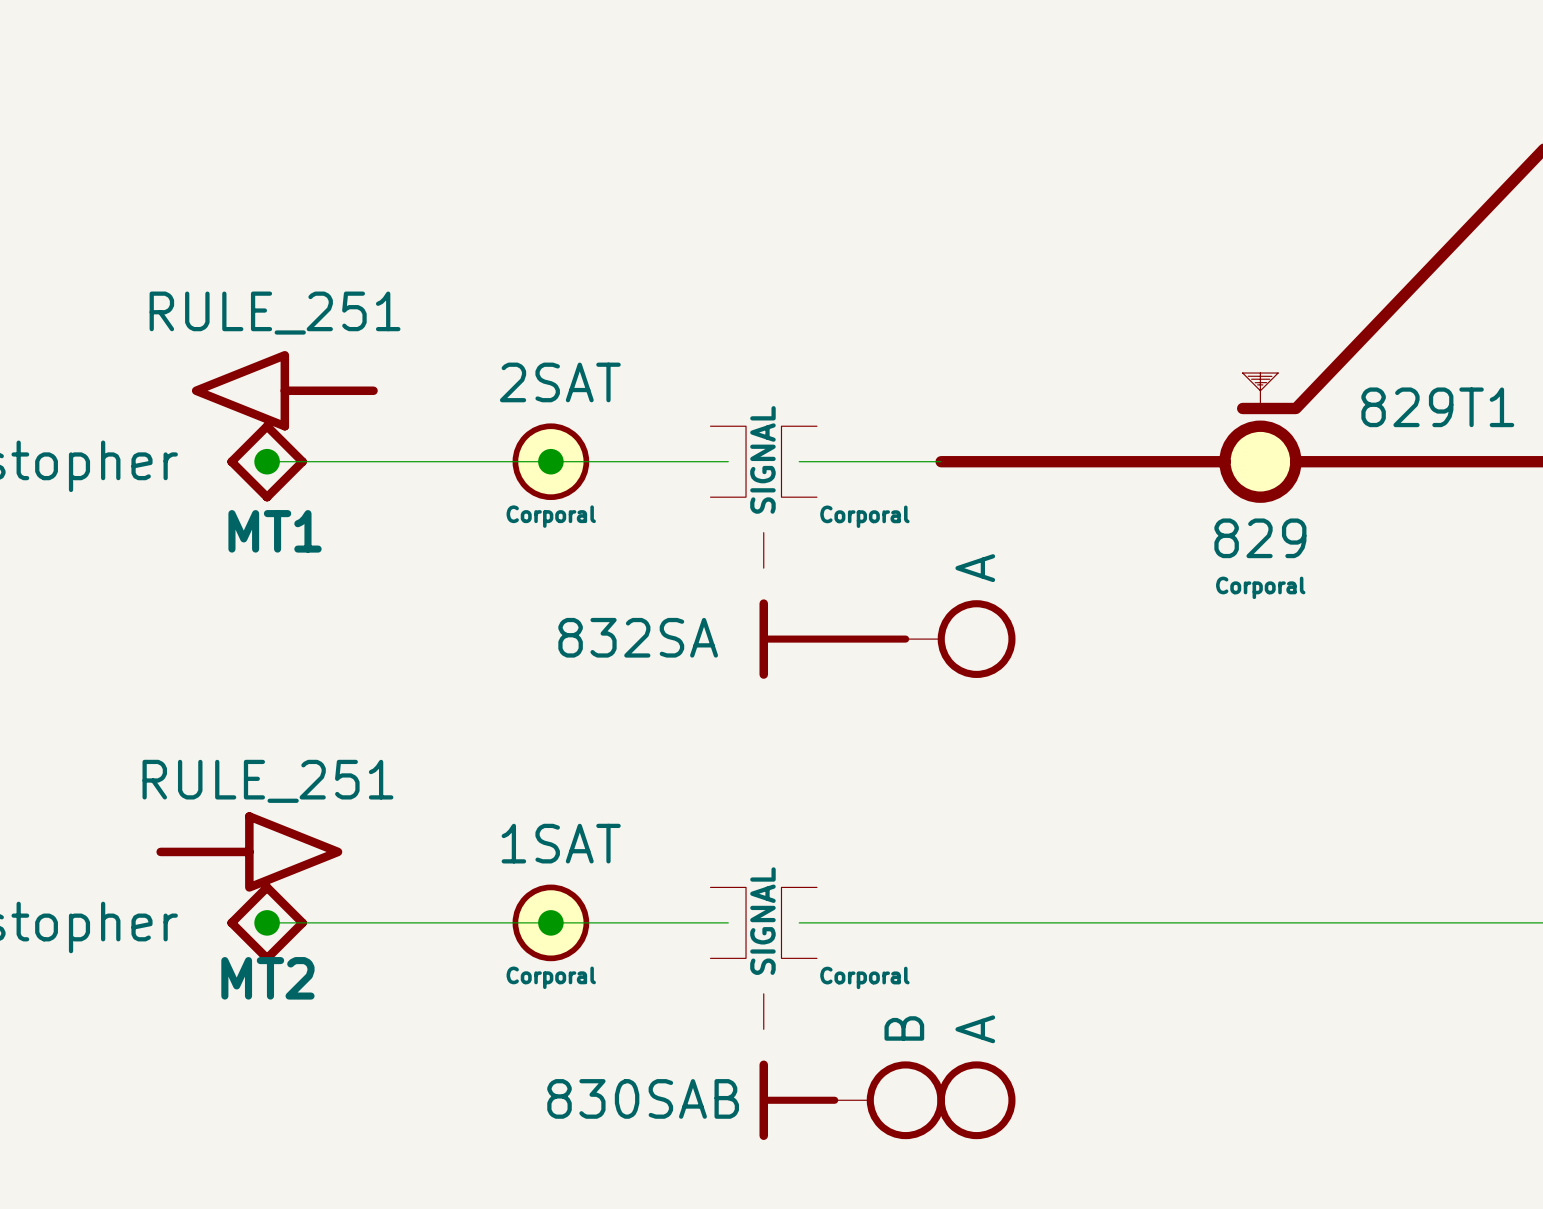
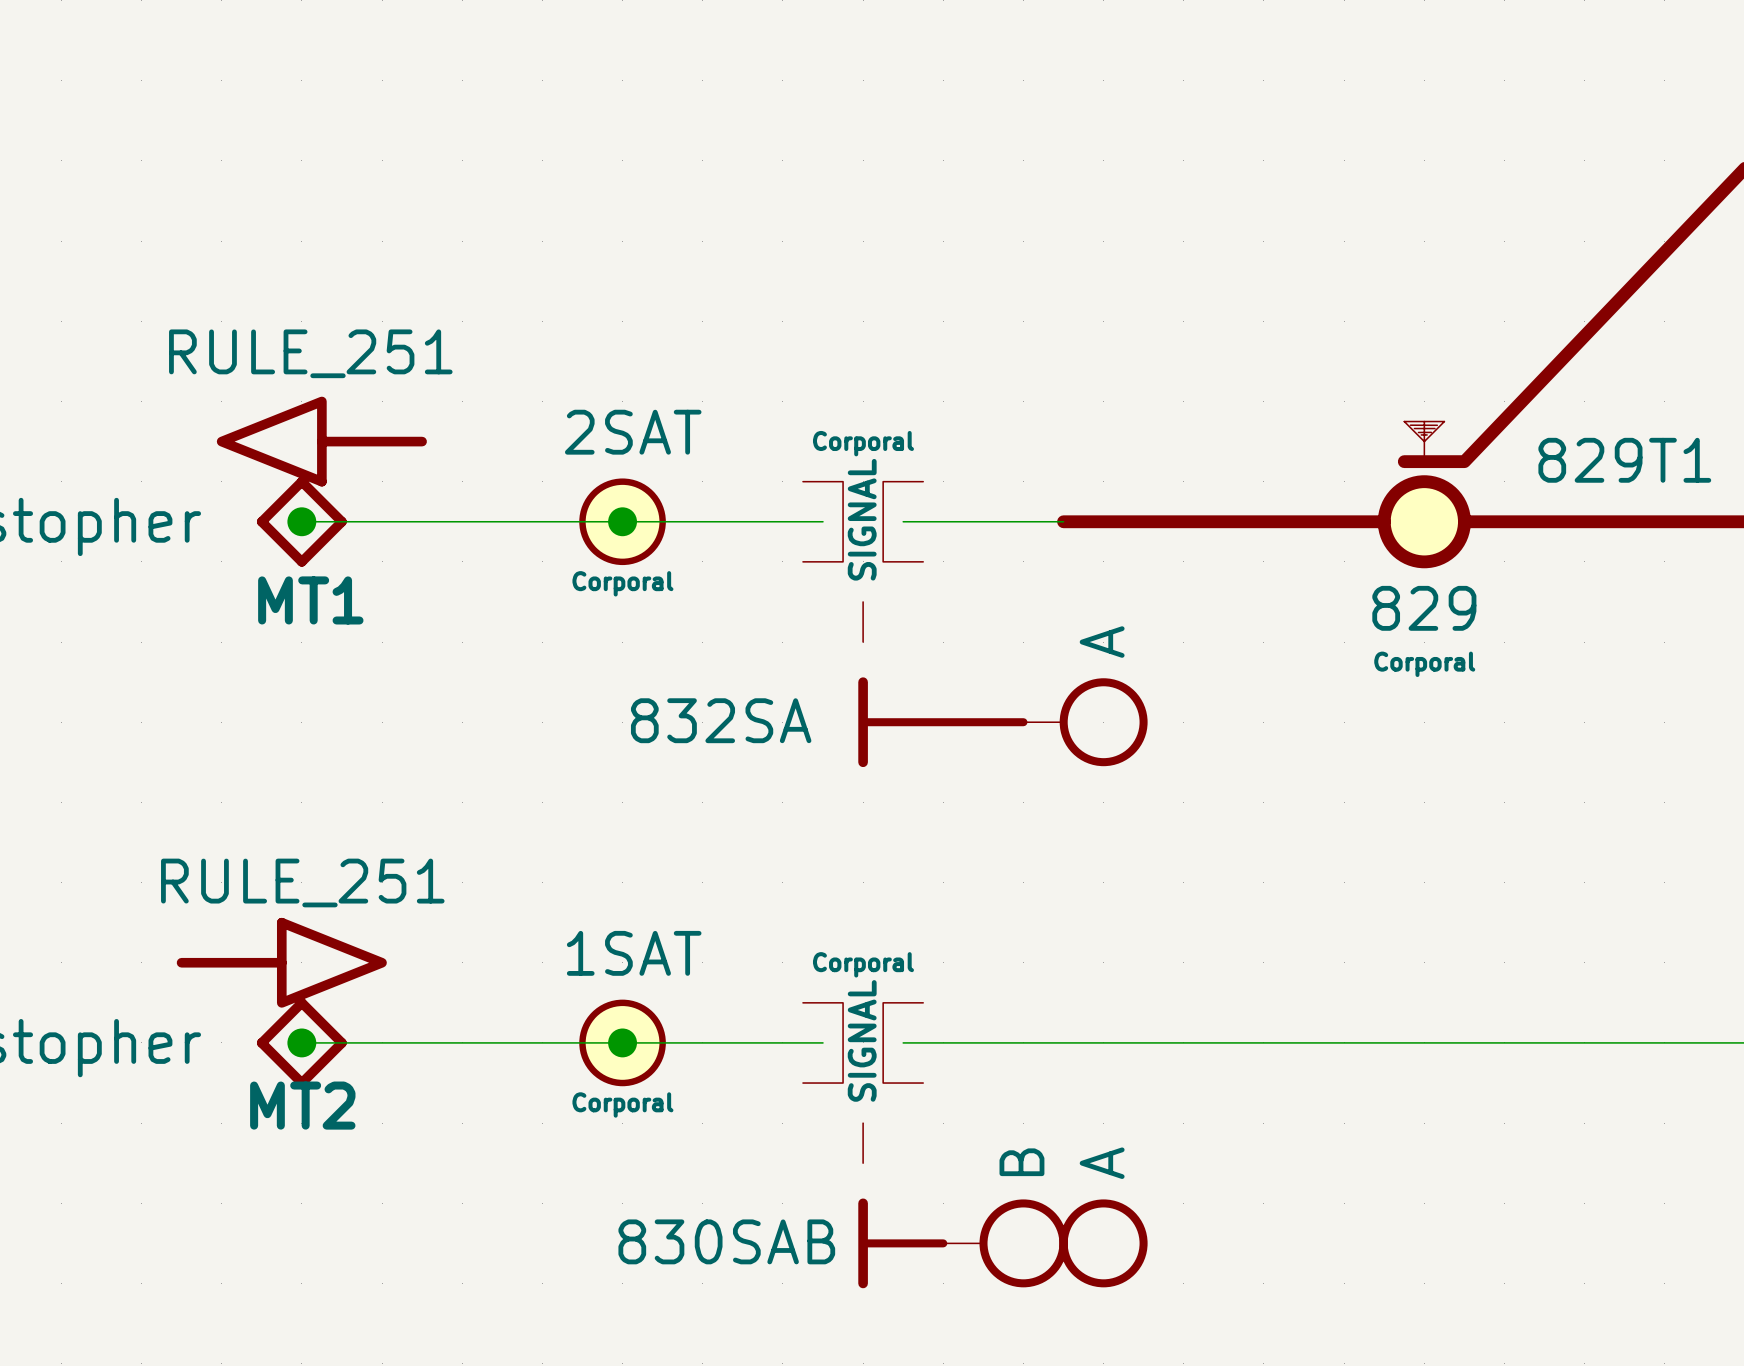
part text position: Corporal (864, 516) -> Corporal (863, 443)
part text position: Corporal (864, 977) -> Corporal (863, 964)

